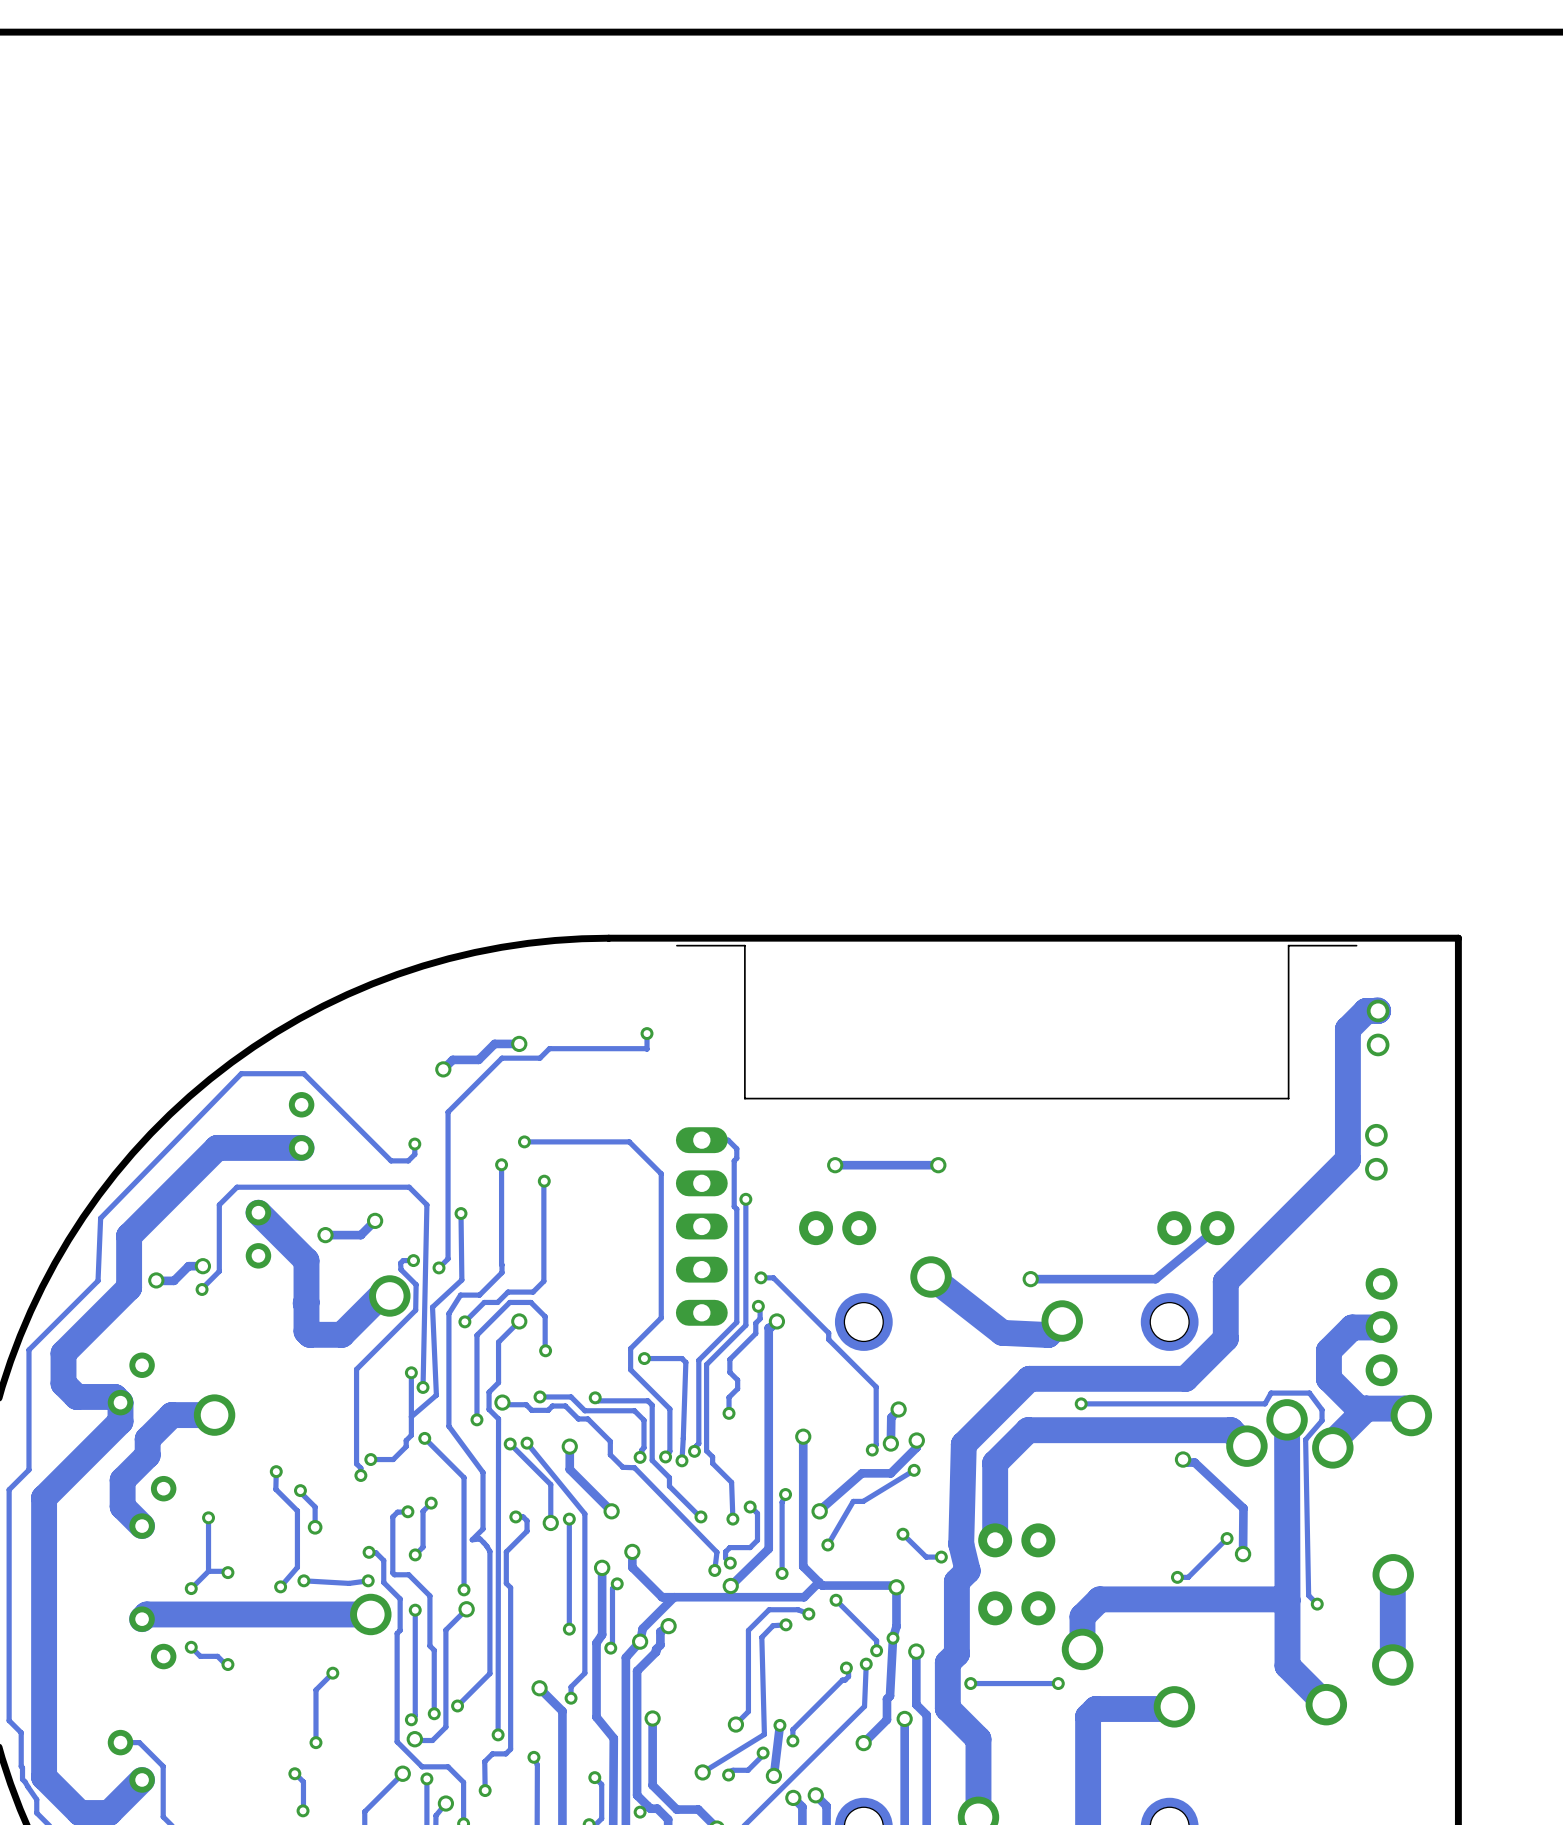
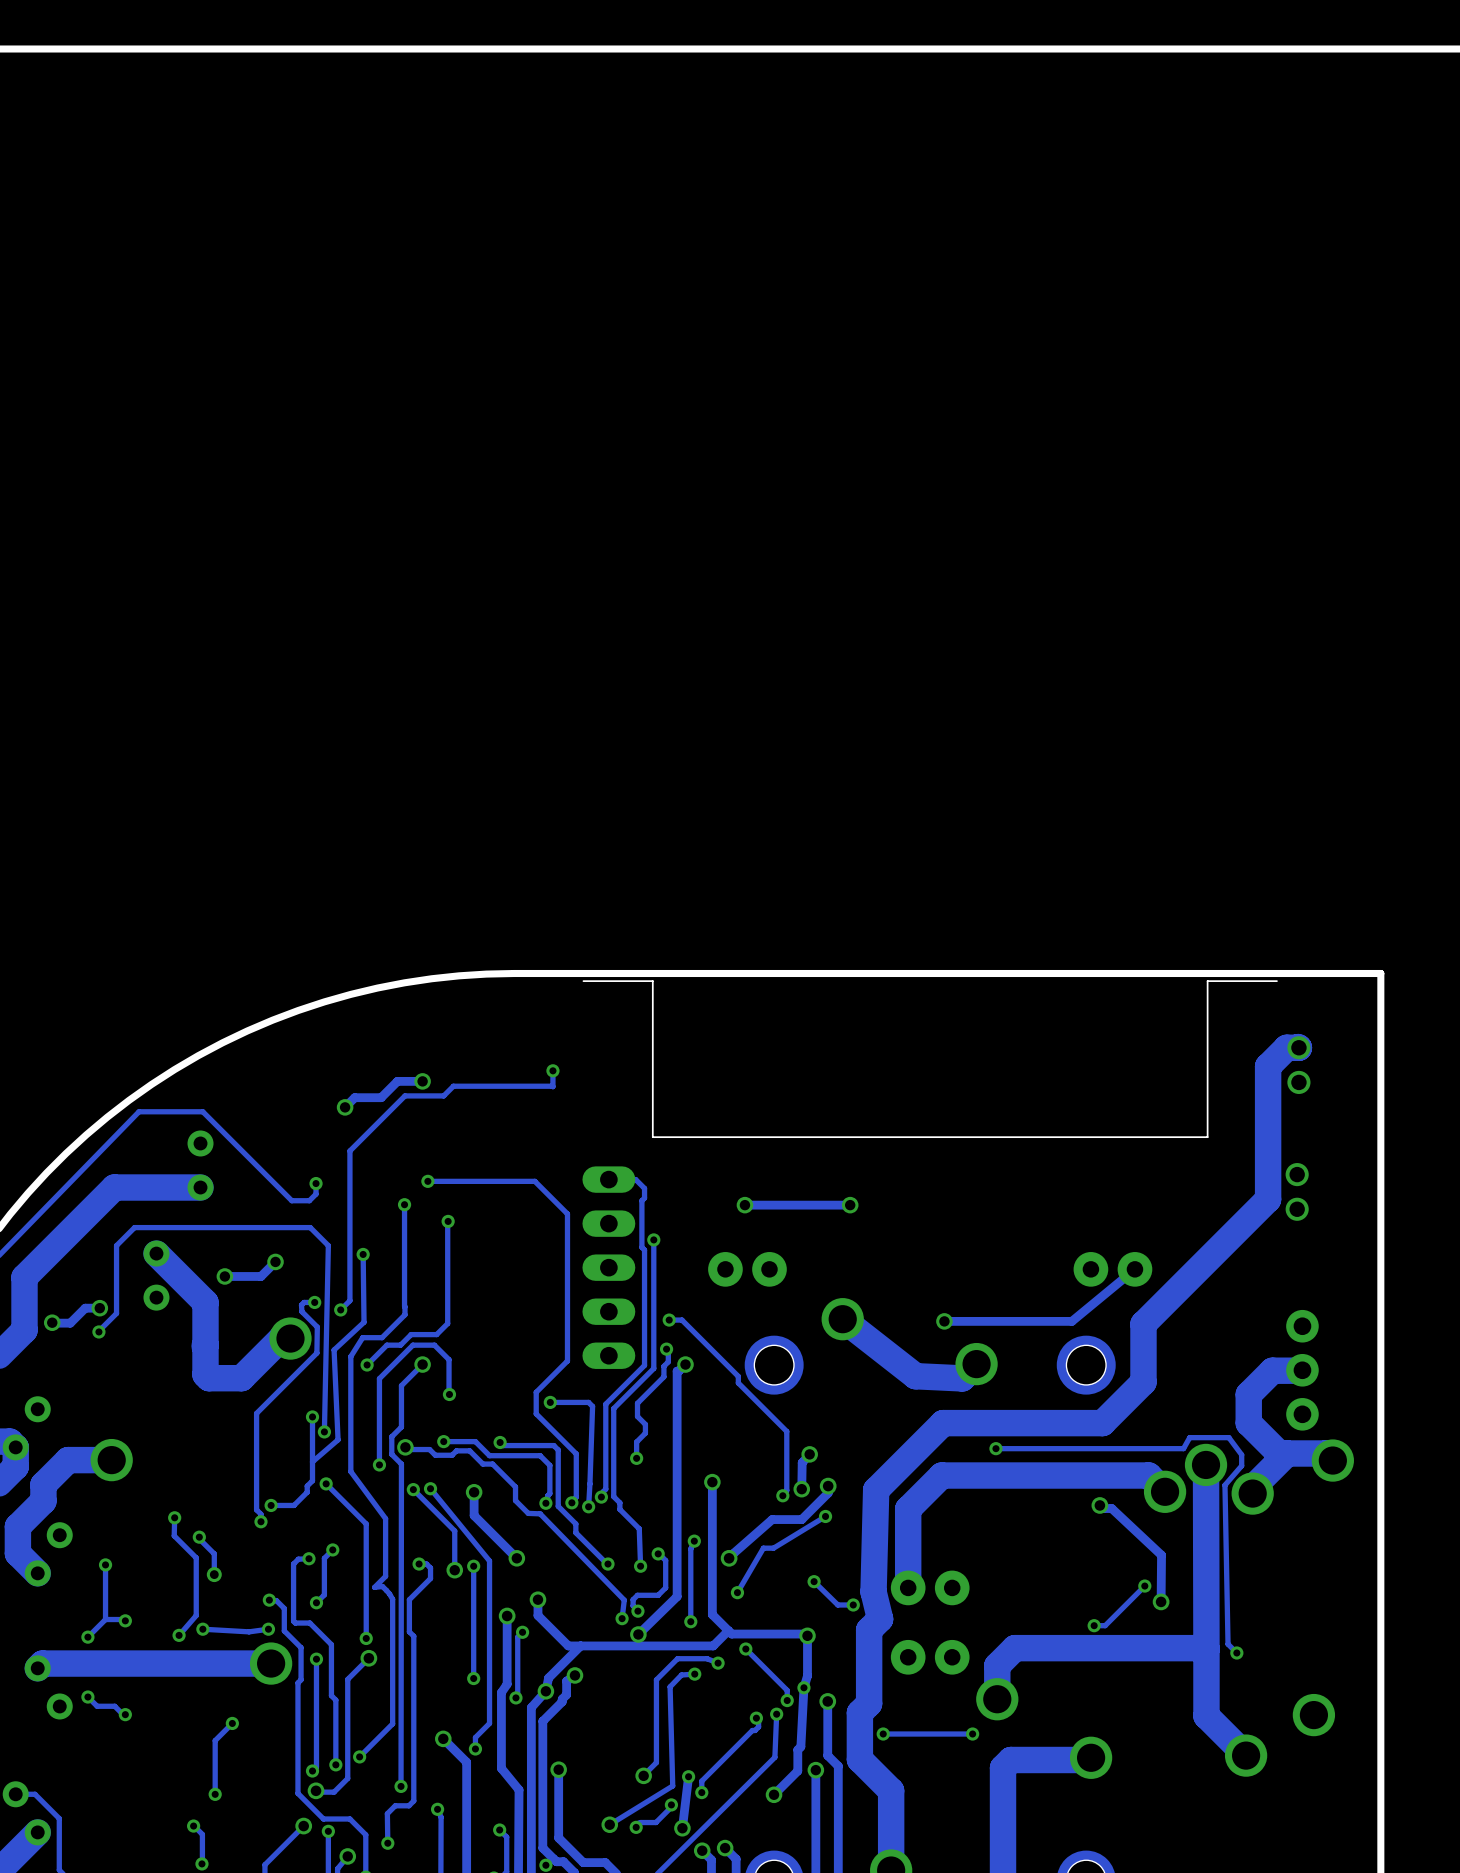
track: (1393, 1574) (1392, 1664) -> none
via: (1393, 1574) -> none

